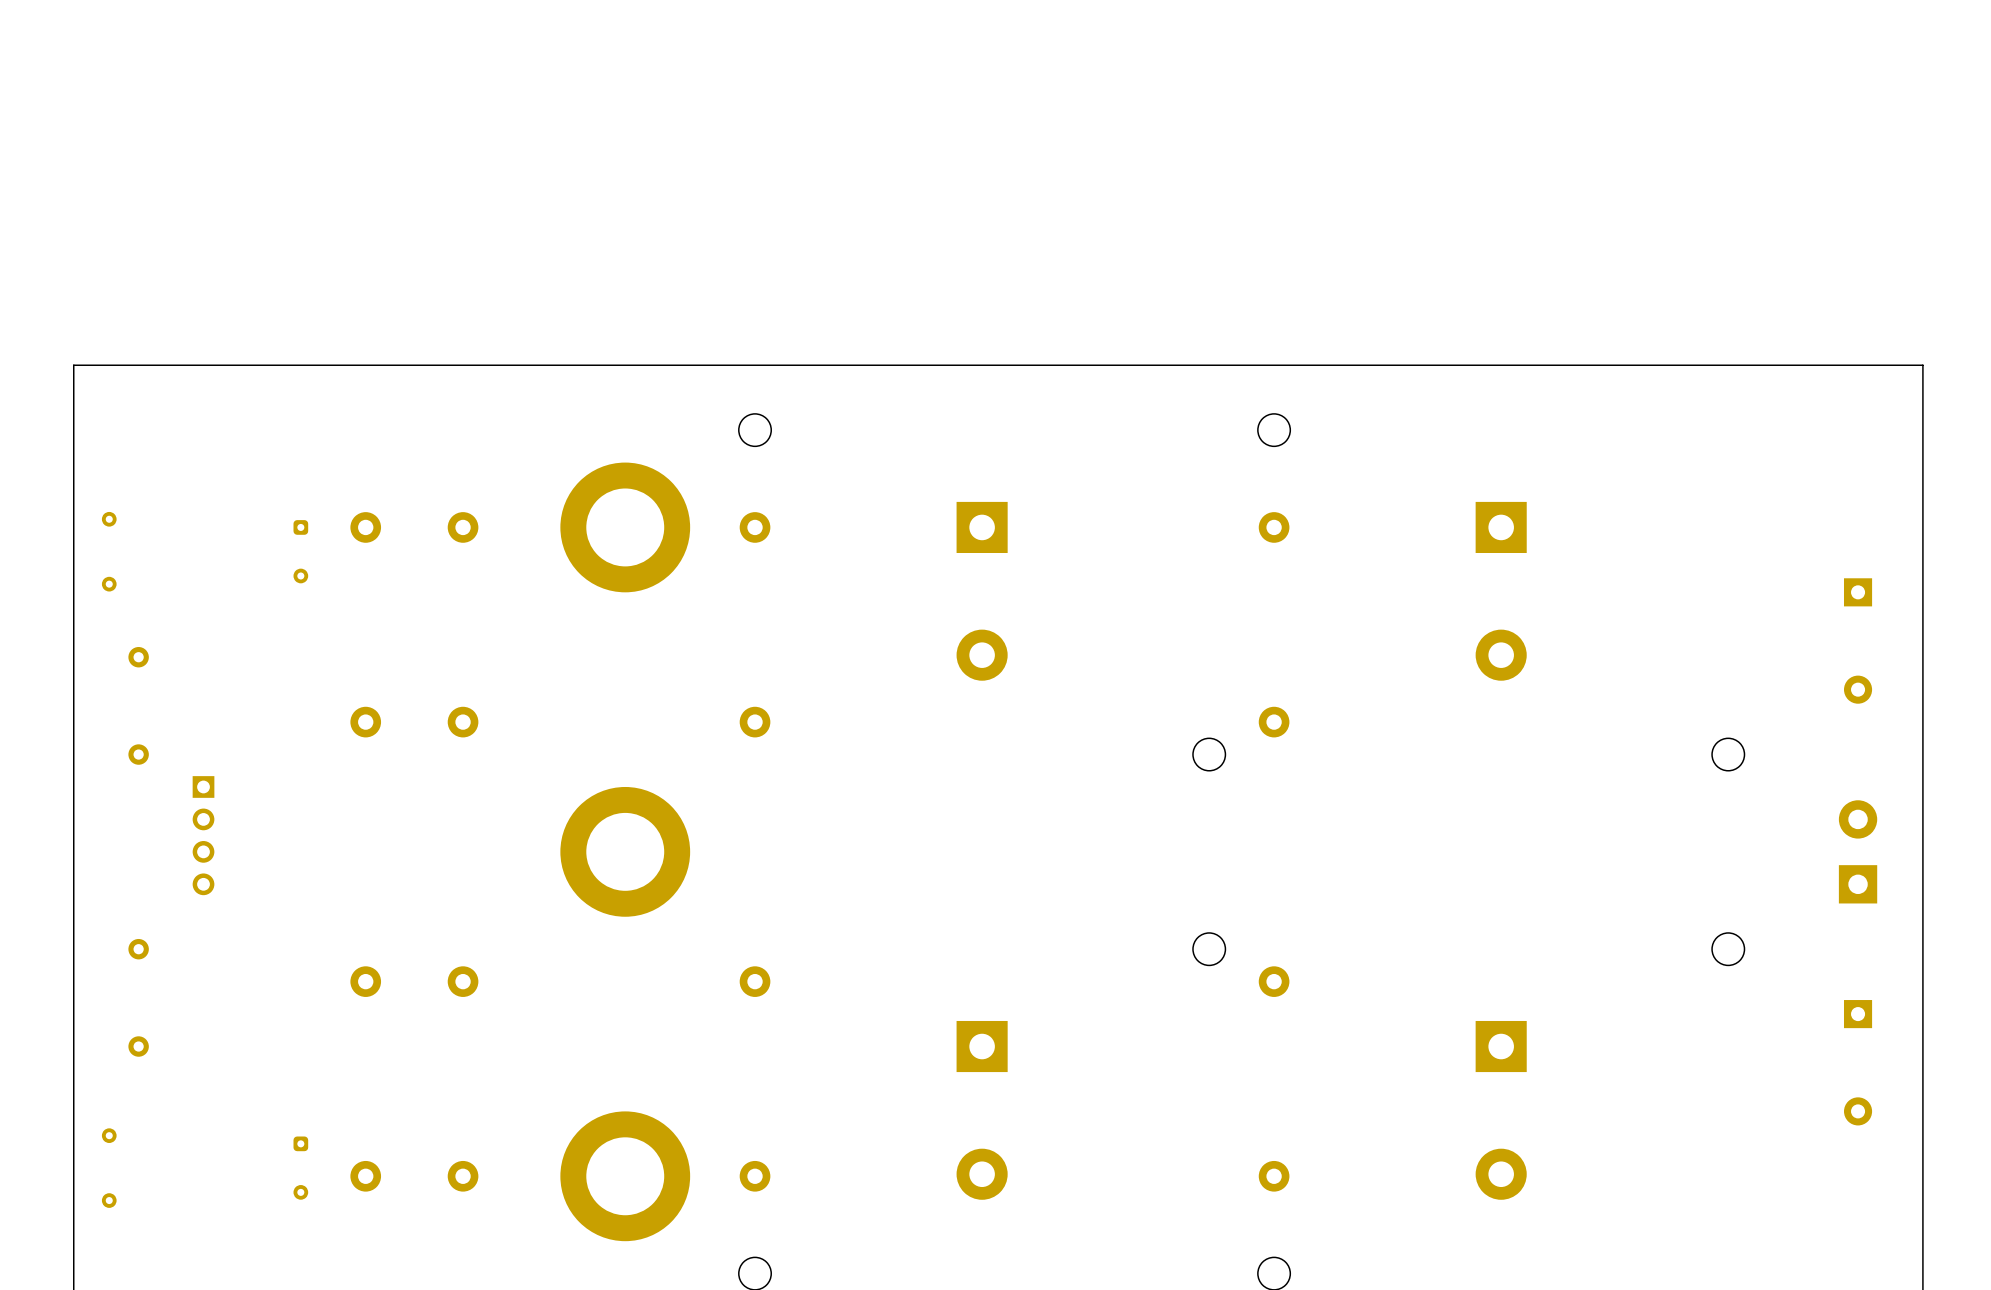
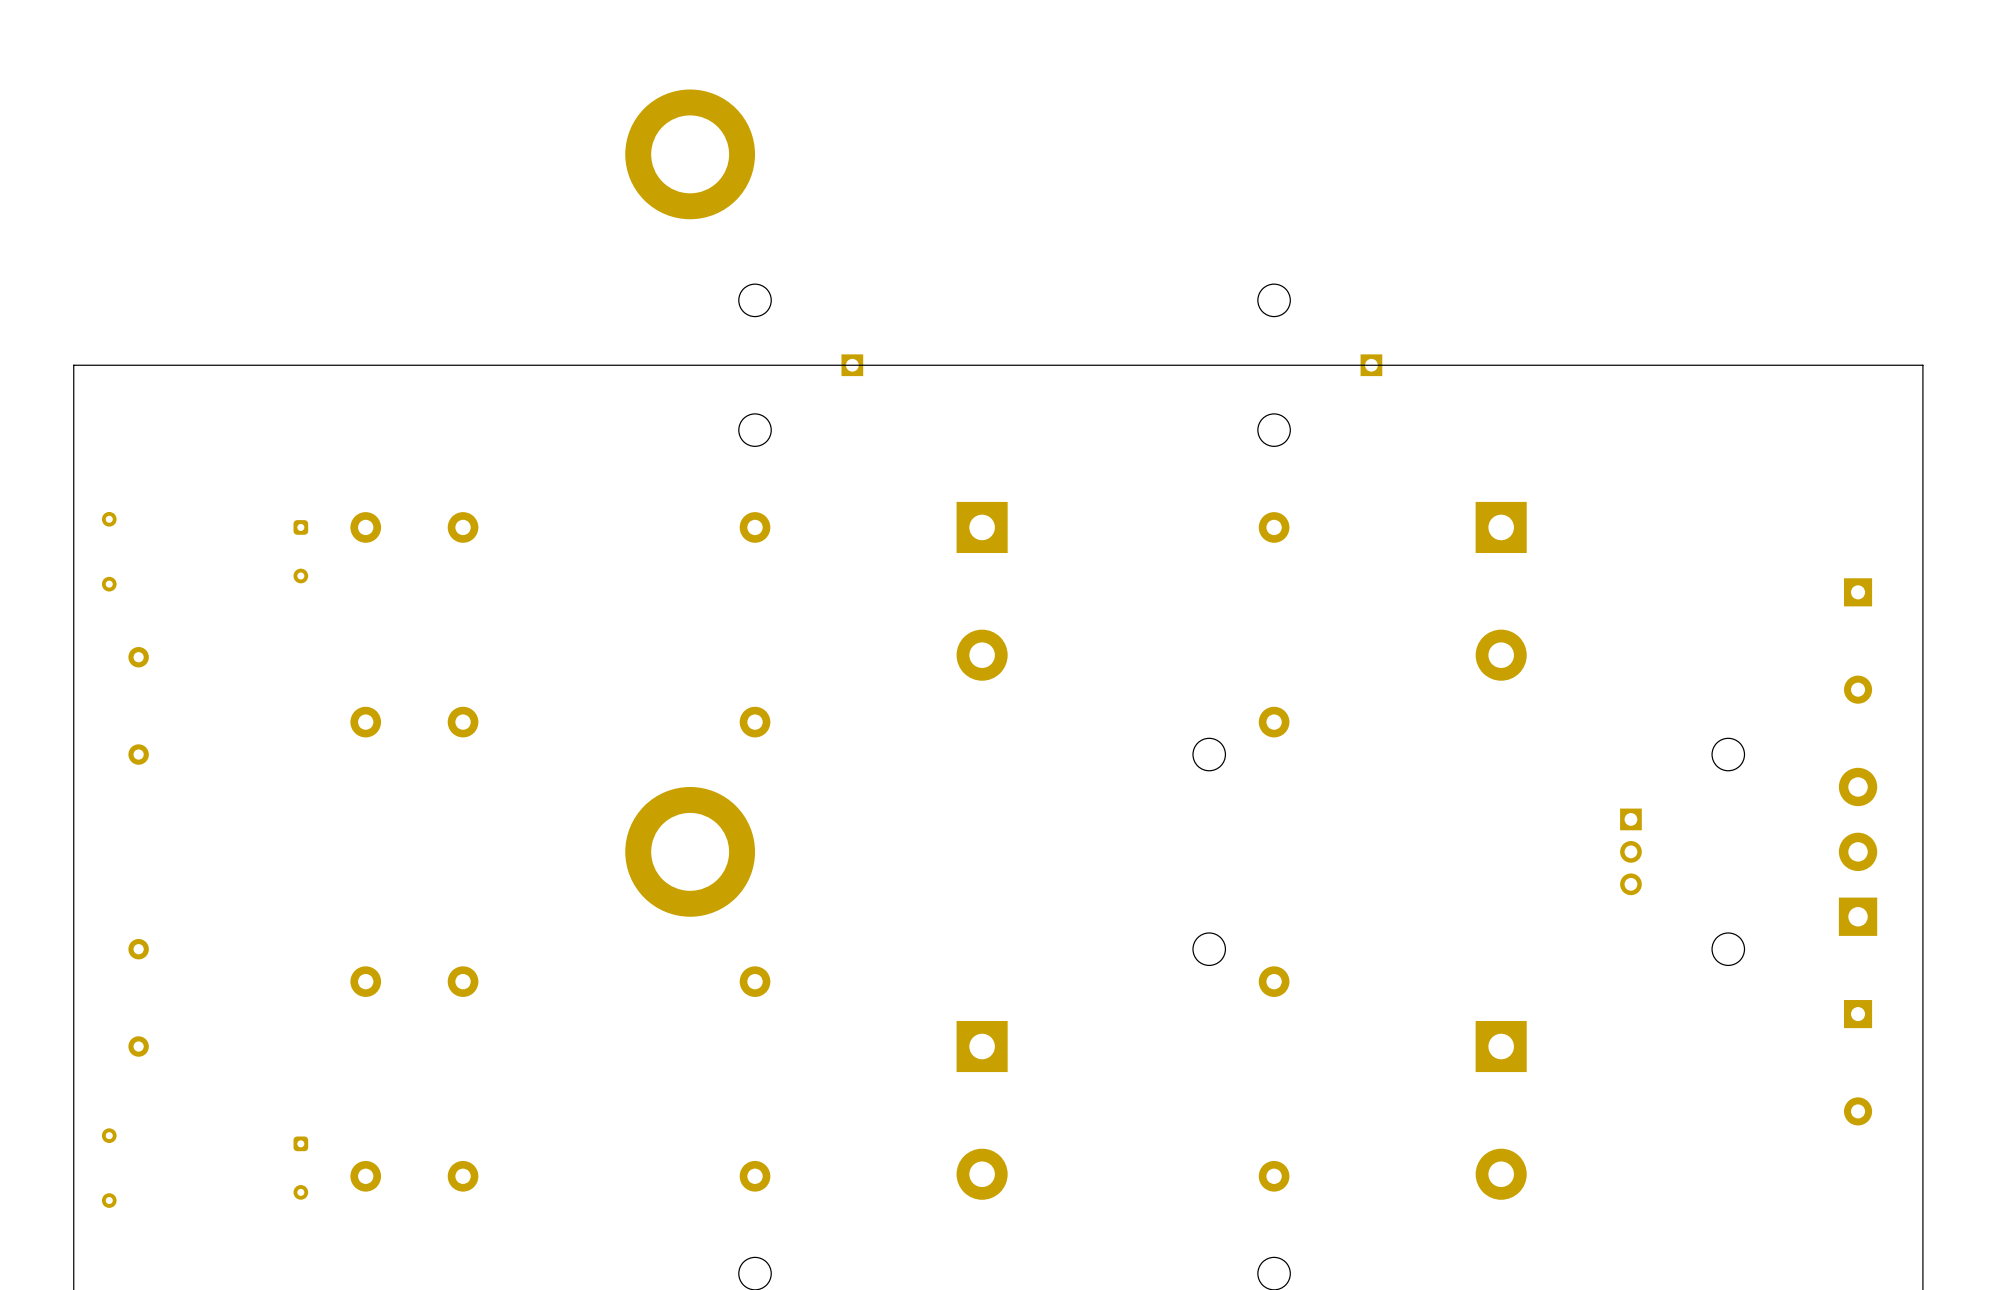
part: none -> (690, 154)
round board edge: none -> [738, 283, 772, 317]
round board edge: none -> [1257, 283, 1291, 317]
part: none -> (852, 365)
part: none -> (1371, 365)
part: (625, 527) -> none
part footprint: [1838, 800, 1878, 904] -> [1838, 767, 1878, 936]
part: (203, 835) -> none
part position: (625, 851) -> (690, 851)
part: none -> (1630, 851)
part: (625, 1176) -> none

